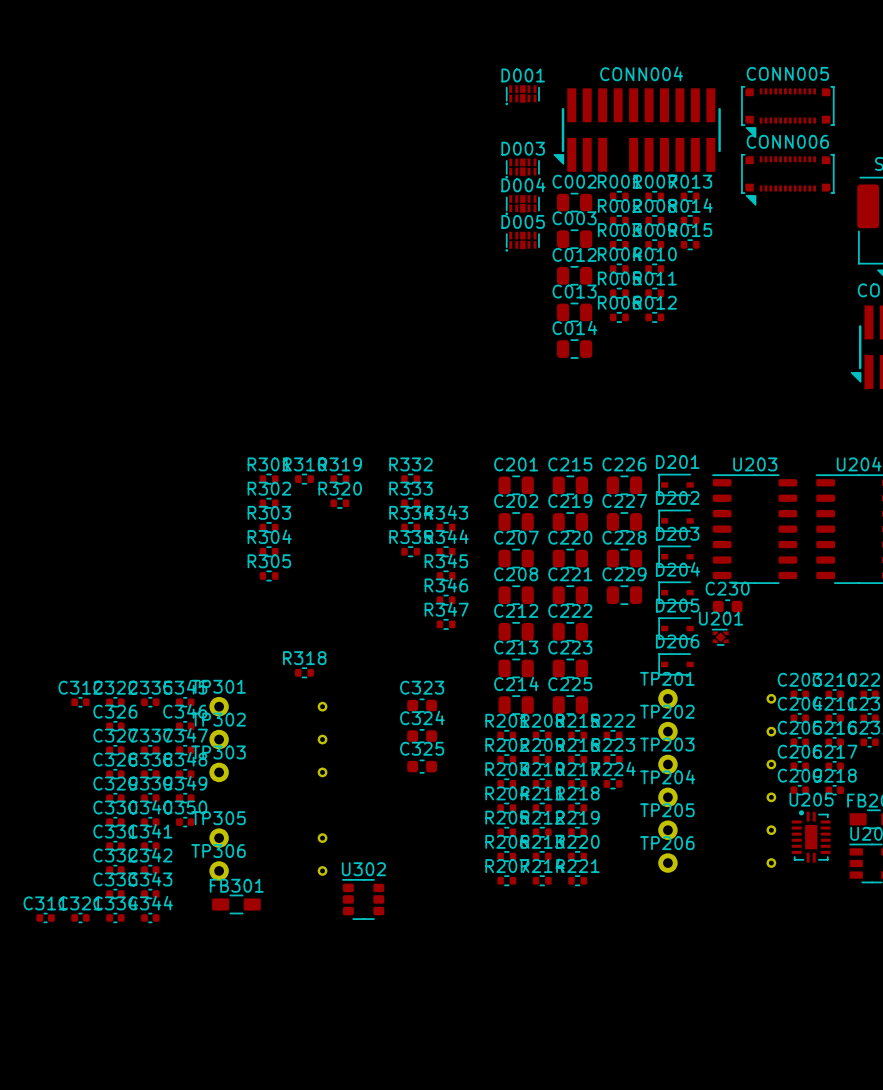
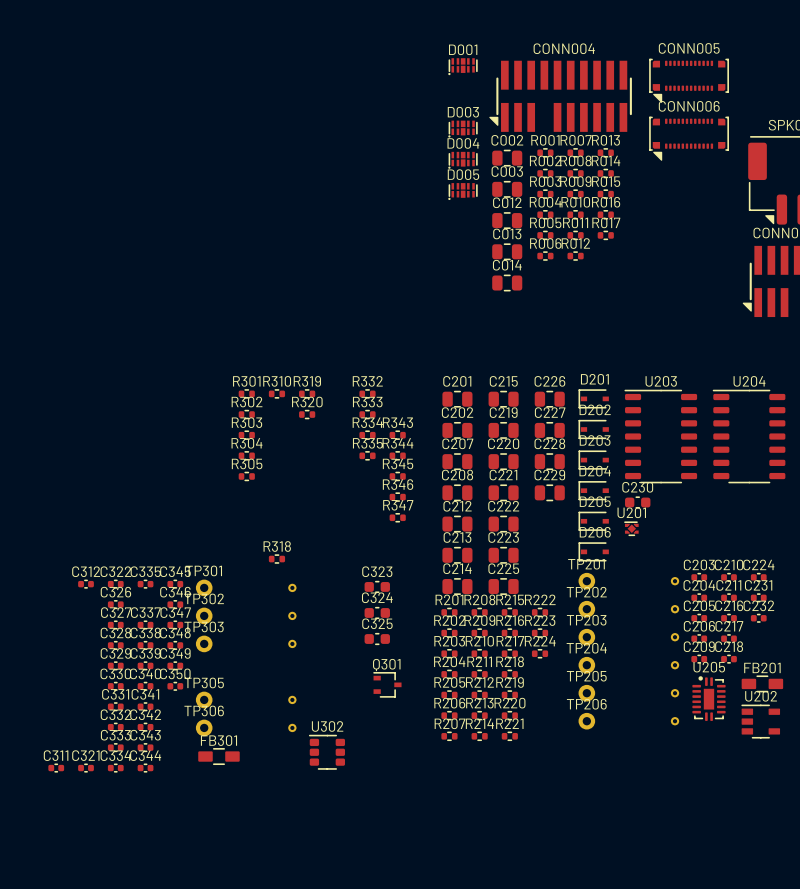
R016: none -> (605, 214)
R017: none -> (605, 235)
Q301: none -> (387, 684)

